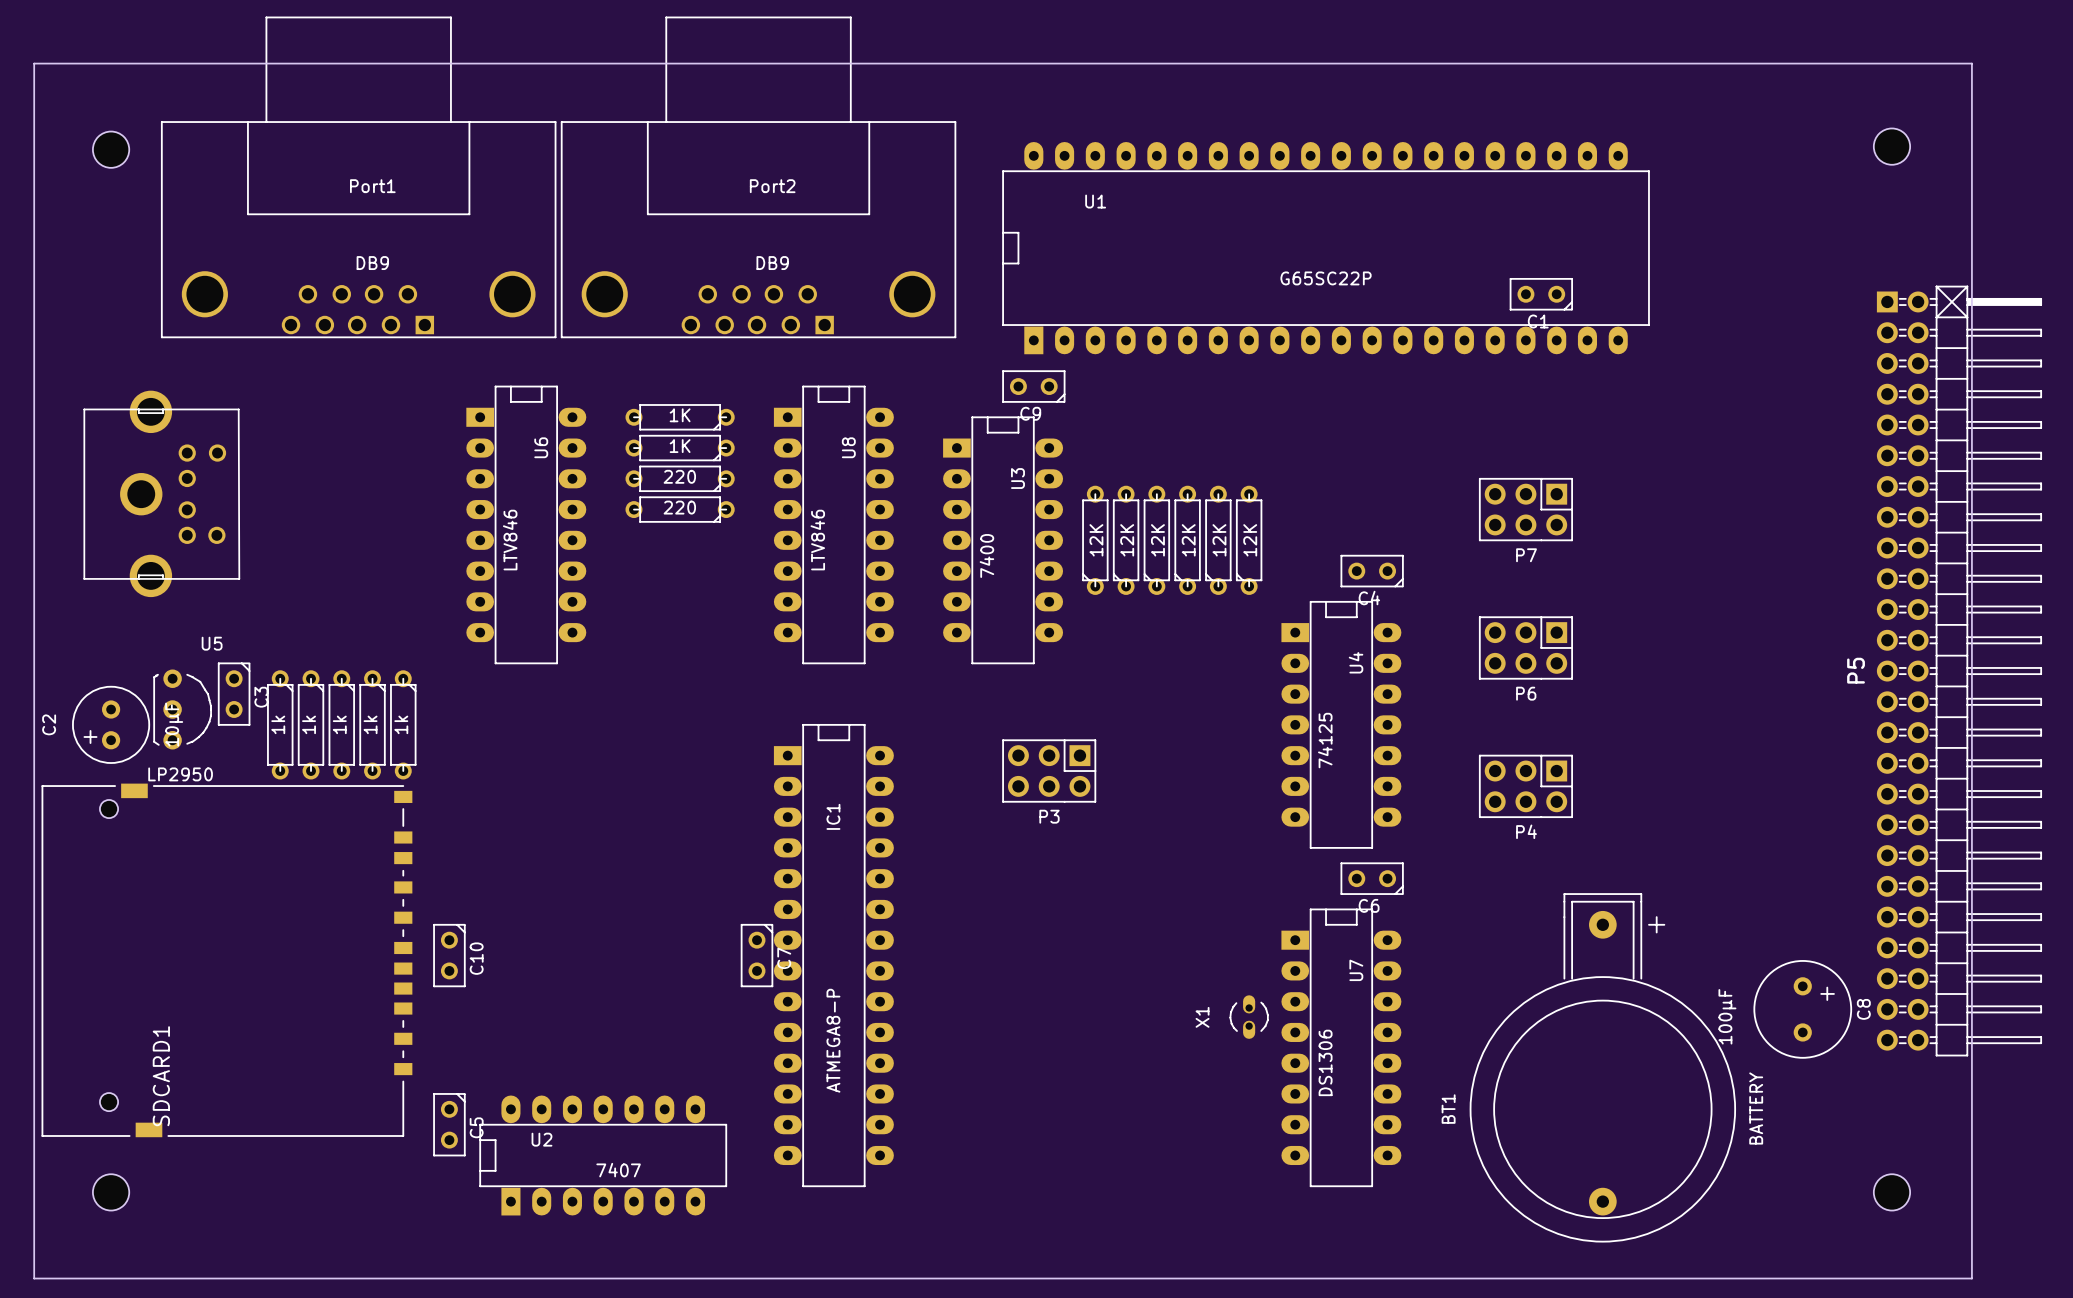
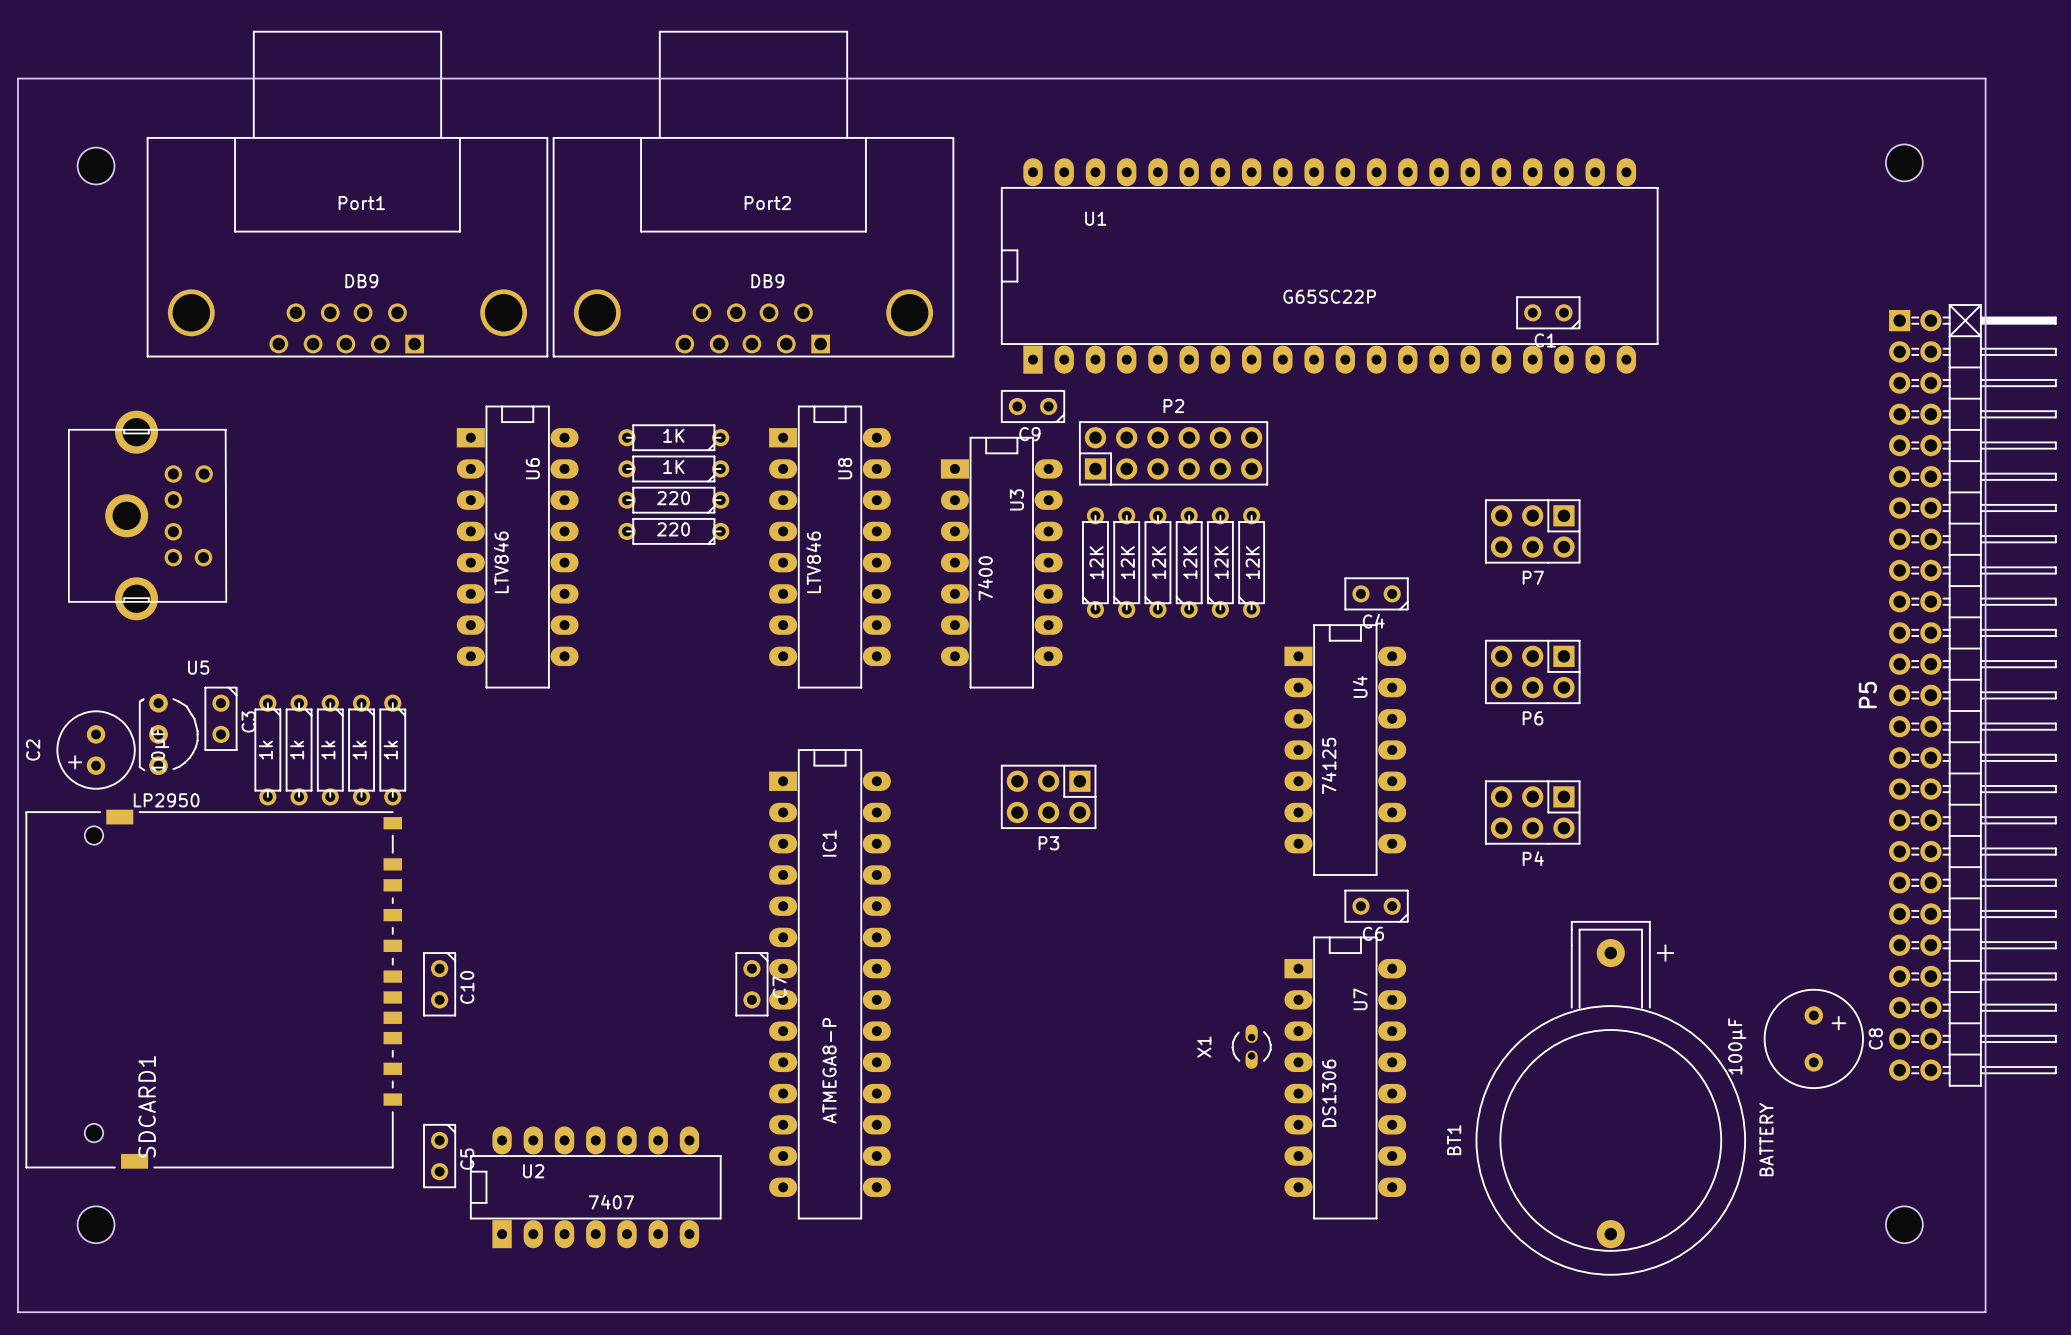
P2: none -> (1173, 453)

